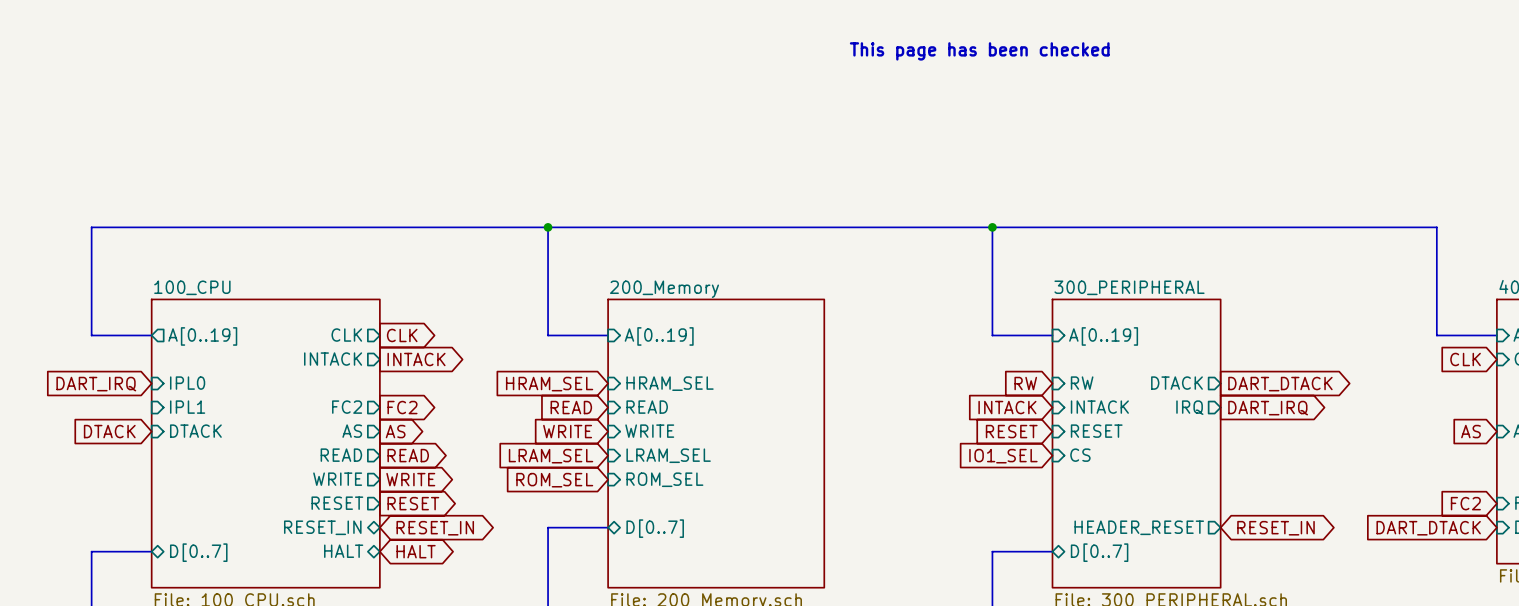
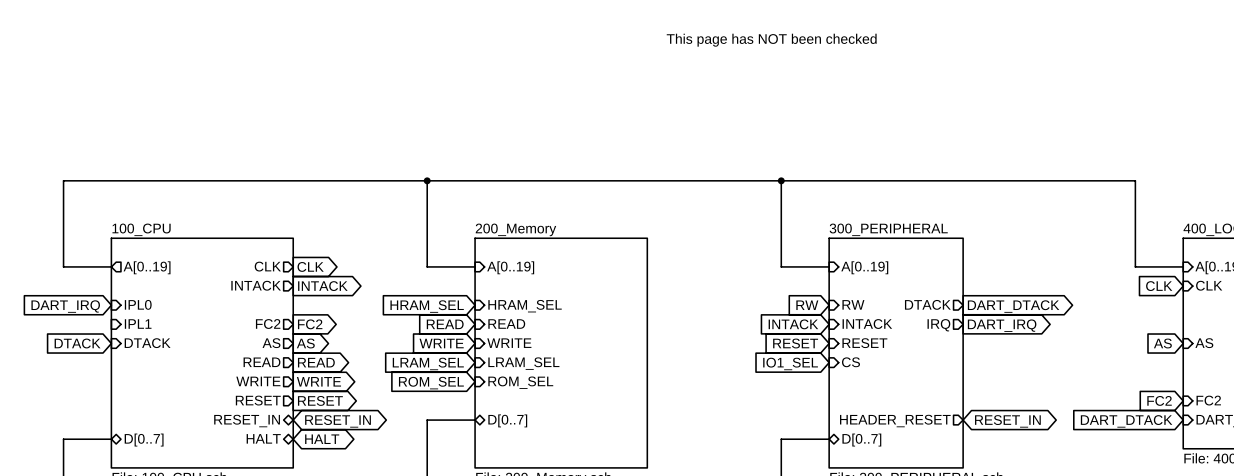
text: This page has been checked (979, 51) -> This page has NOT been checked (771, 40)

